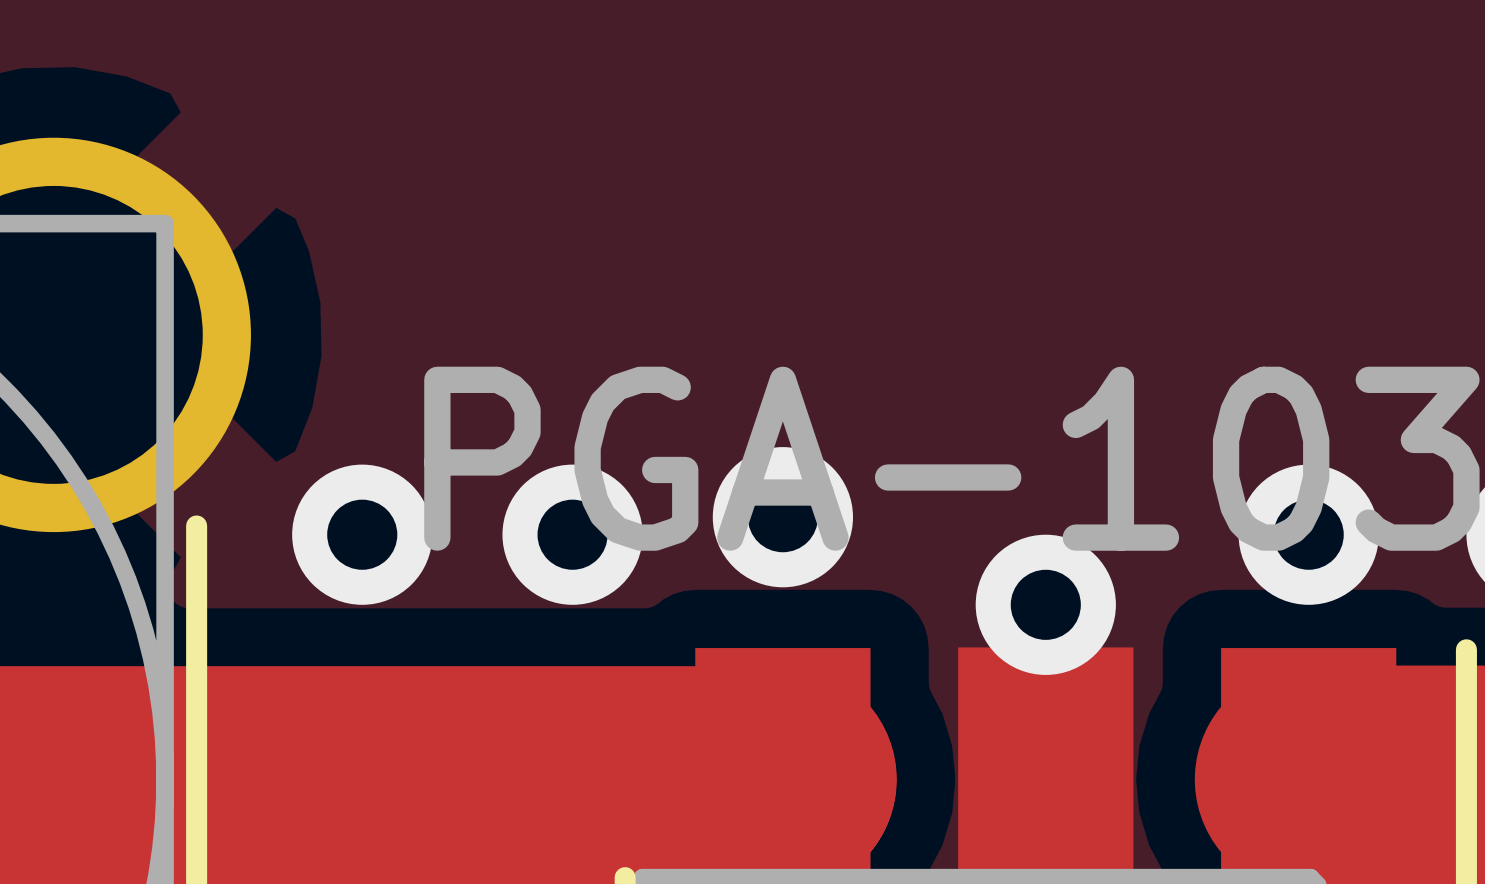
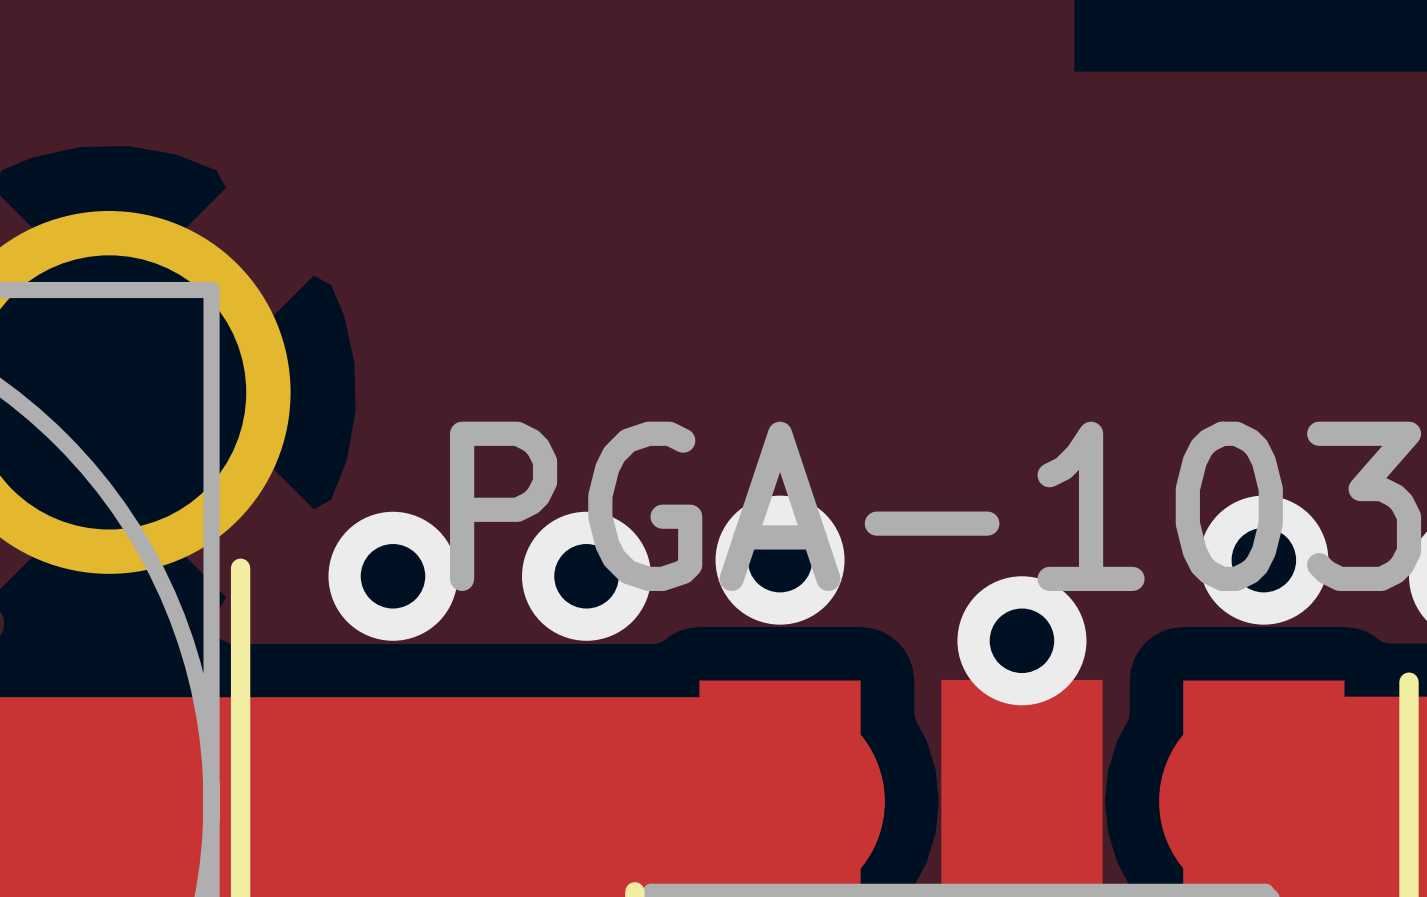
via position: (1308, 534) -> (1263, 560)

